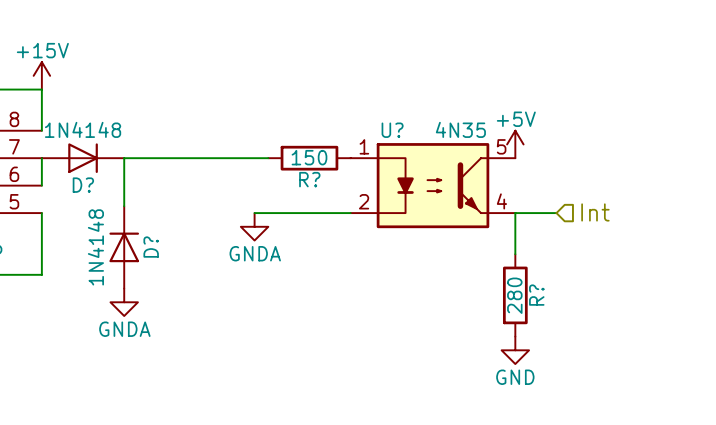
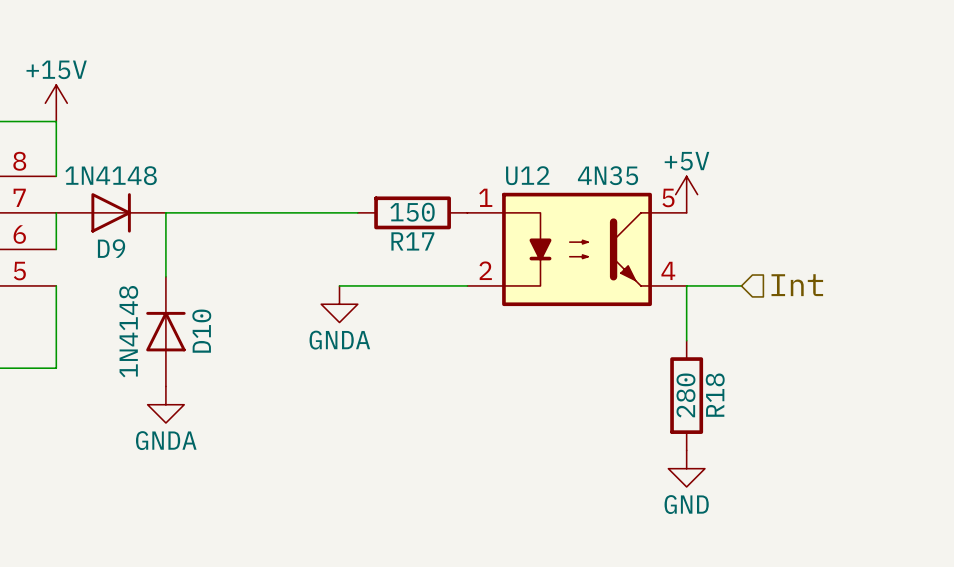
U? name: U? (392, 130) -> U12 (527, 175)
R? name: R? (309, 179) -> R17 (412, 241)
D? name: D? (83, 185) -> D9 (111, 248)
D? name: D? (151, 247) -> D10 (201, 331)
R? name: R? (536, 295) -> R18 (715, 395)

